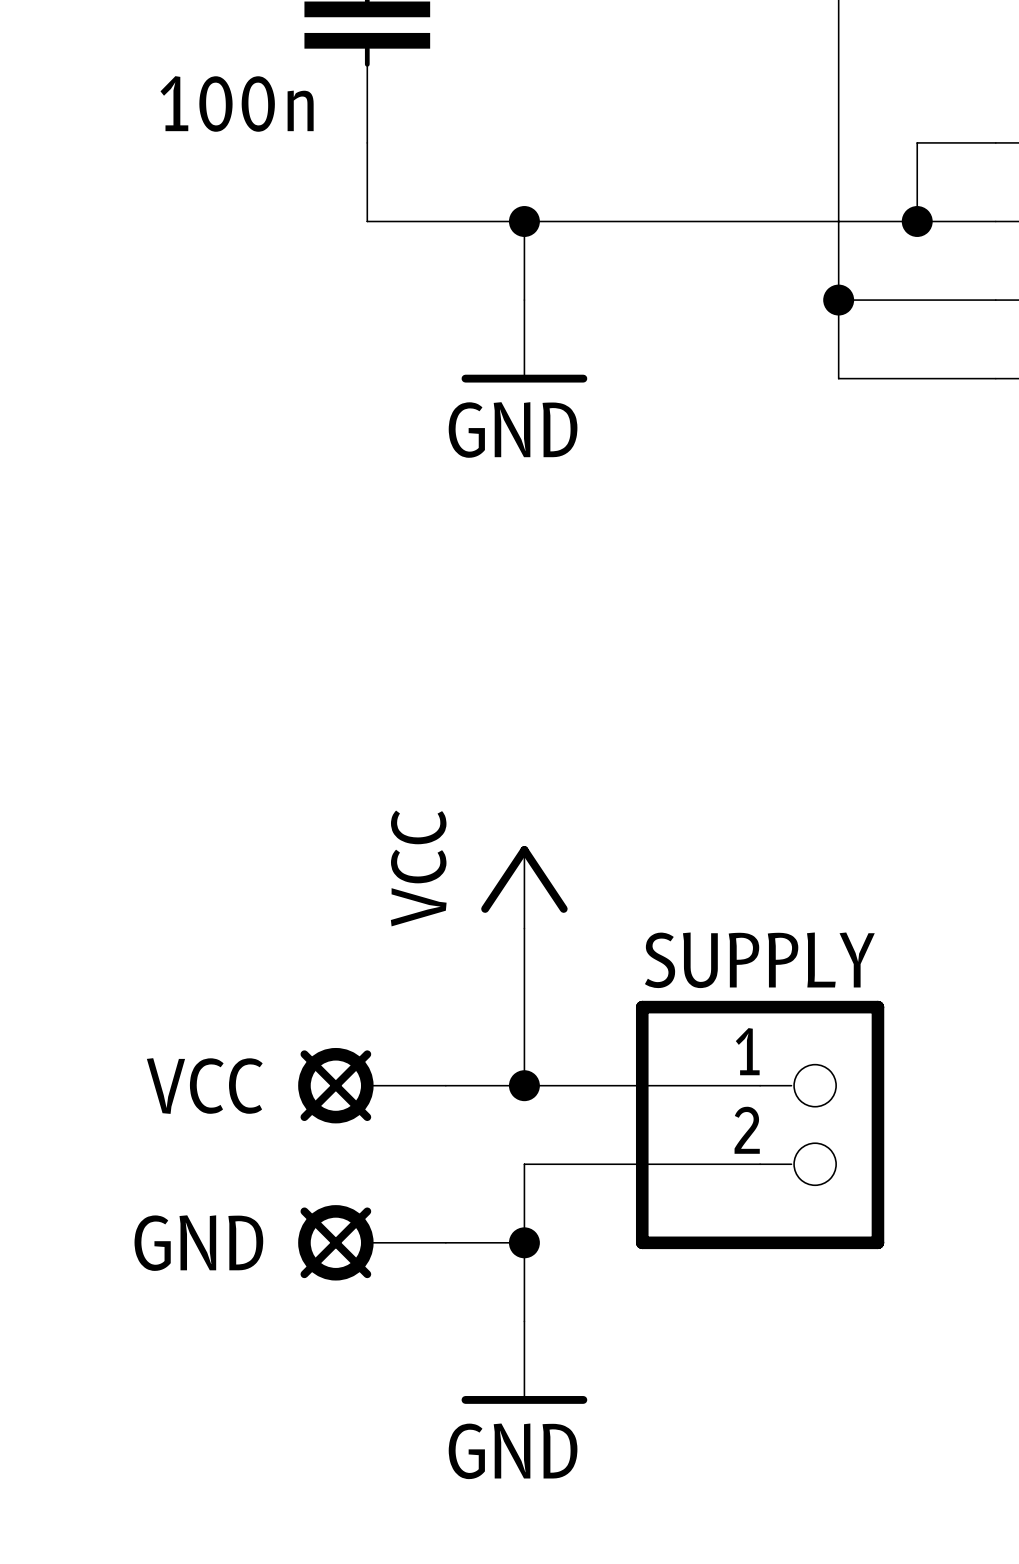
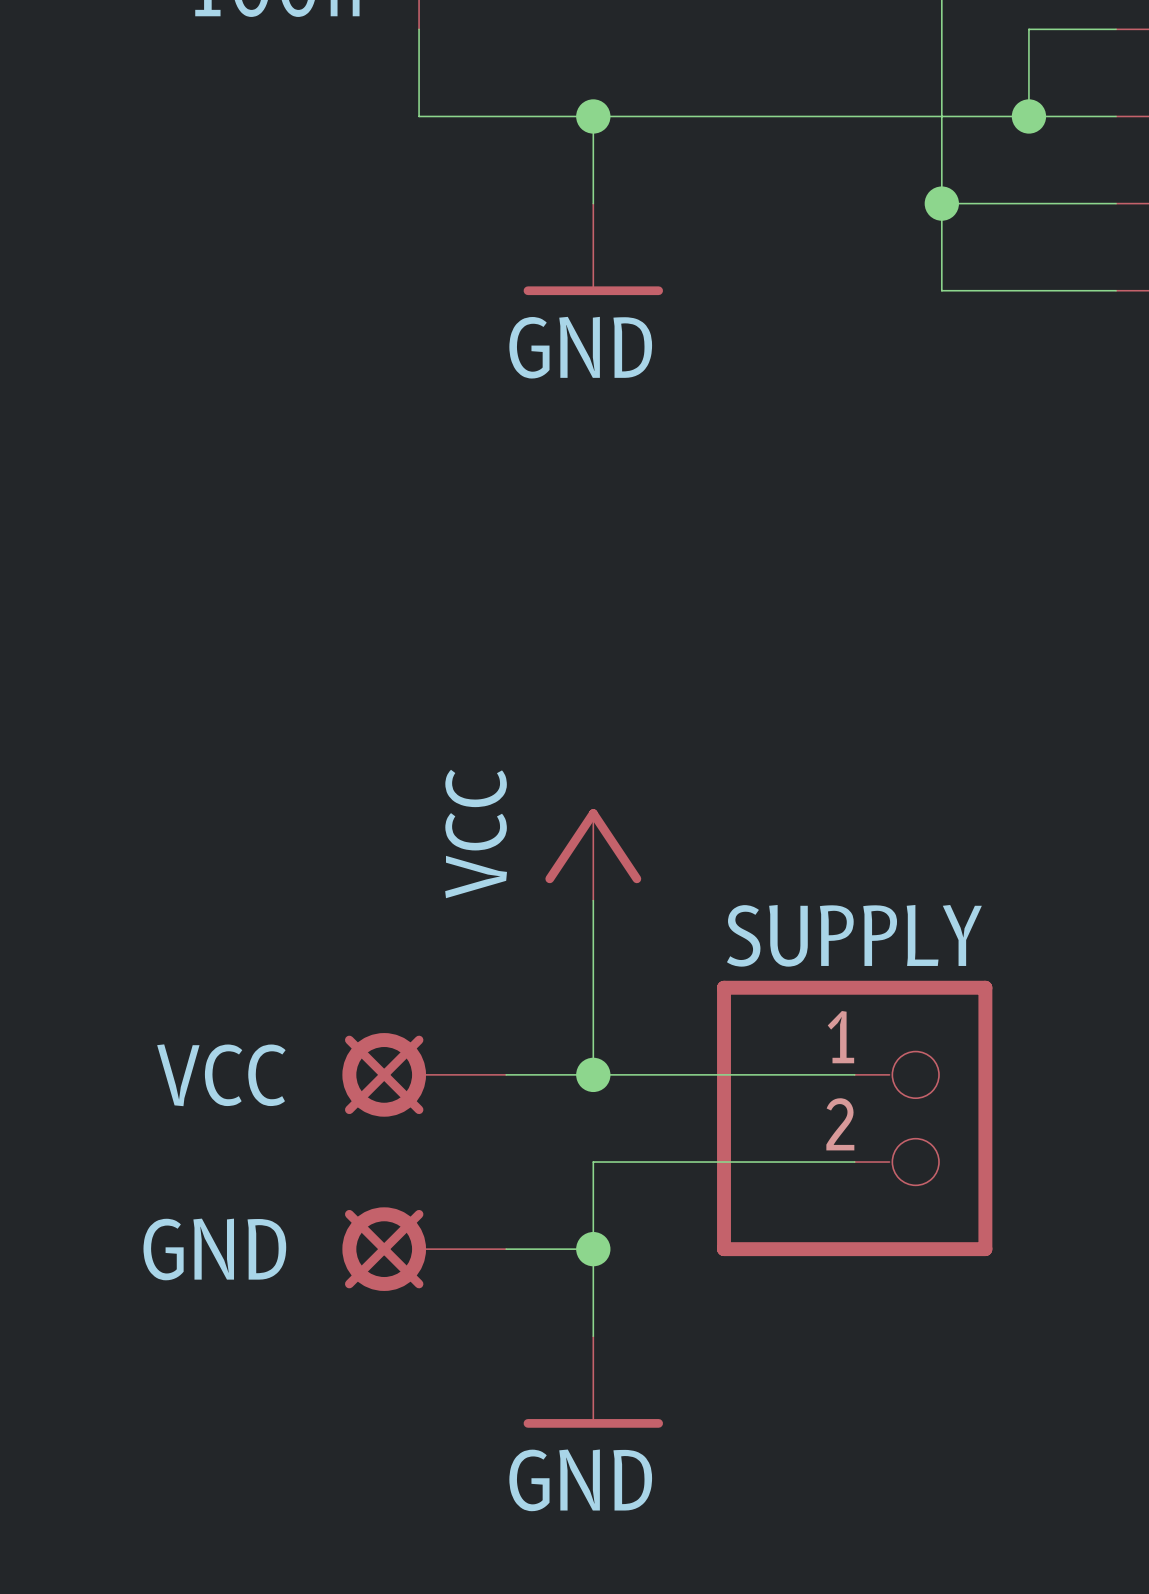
VCC name position: VCC (204, 1086) -> VCC (221, 1075)
GND name position: GND (198, 1243) -> GND (214, 1249)

